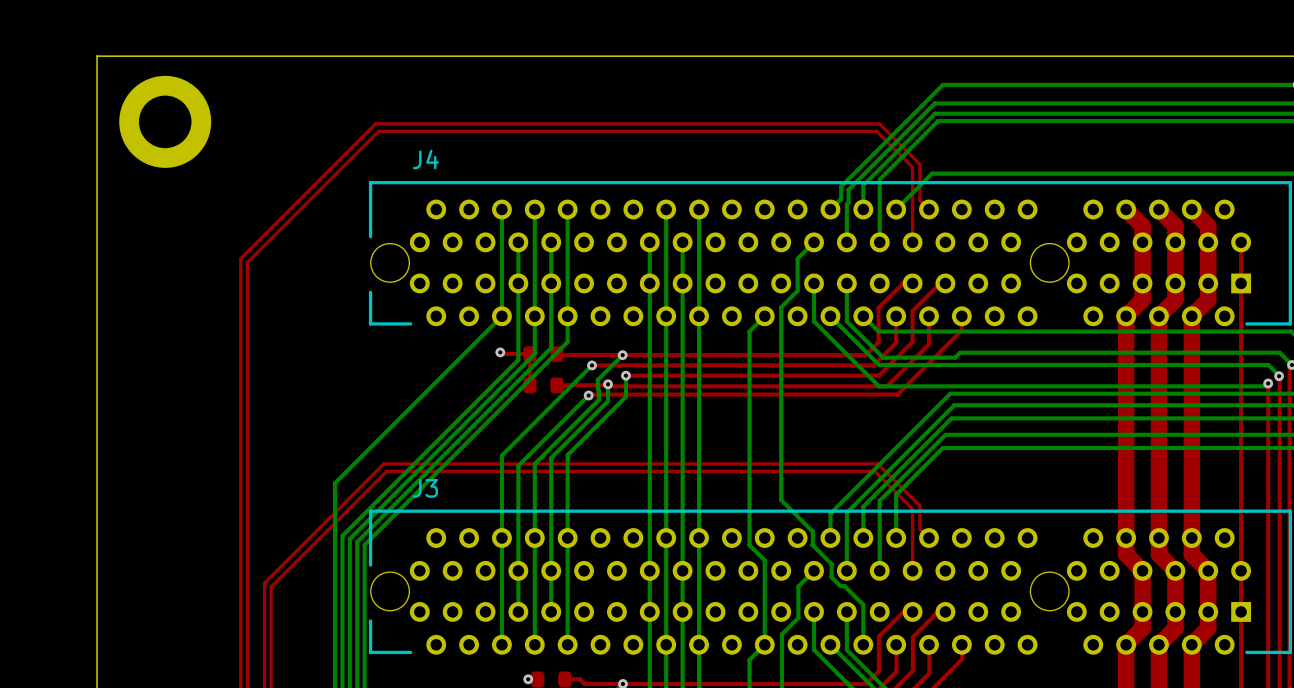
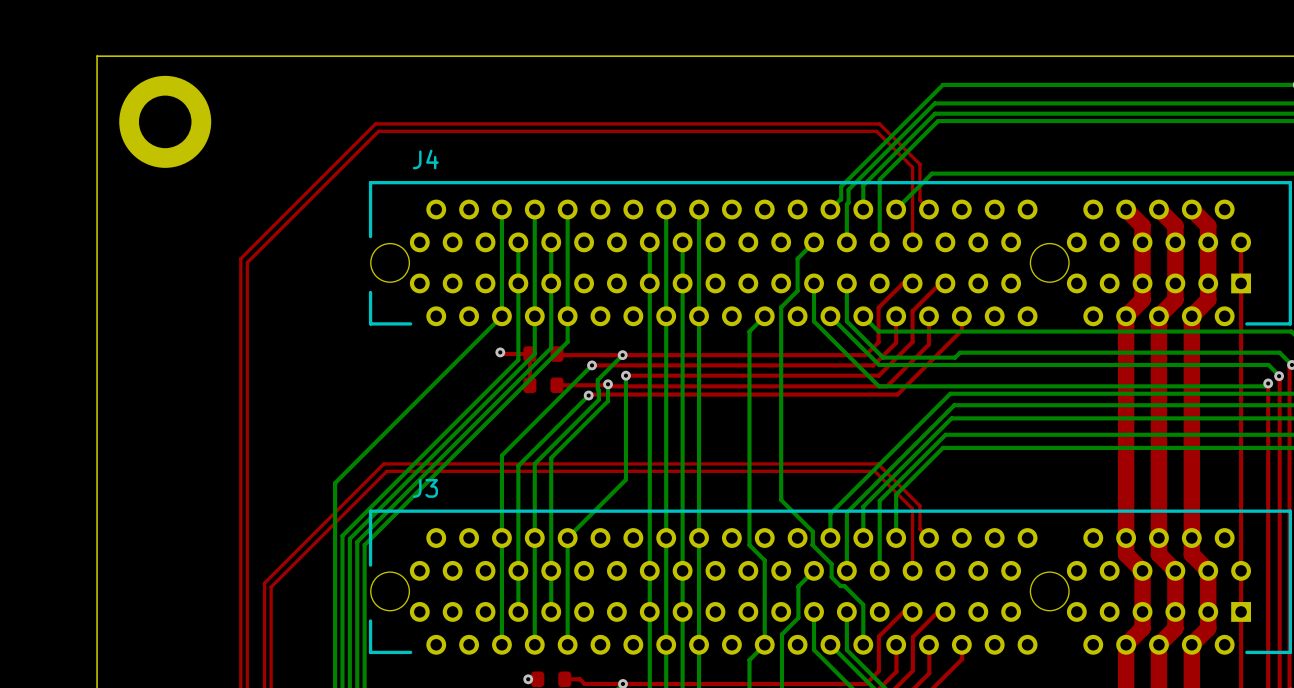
bottom track: (625, 396) (567, 455) (567, 538) -> (625, 396) (625, 479) (567, 538)

